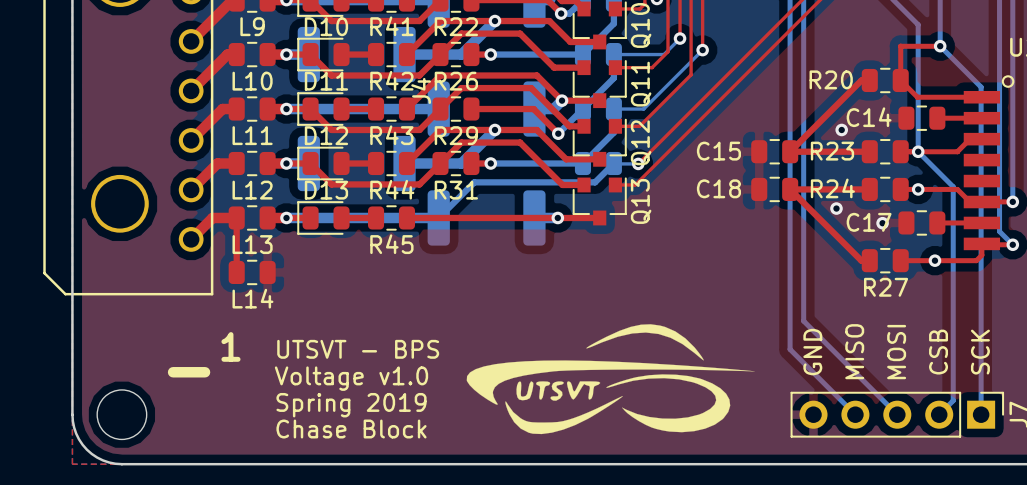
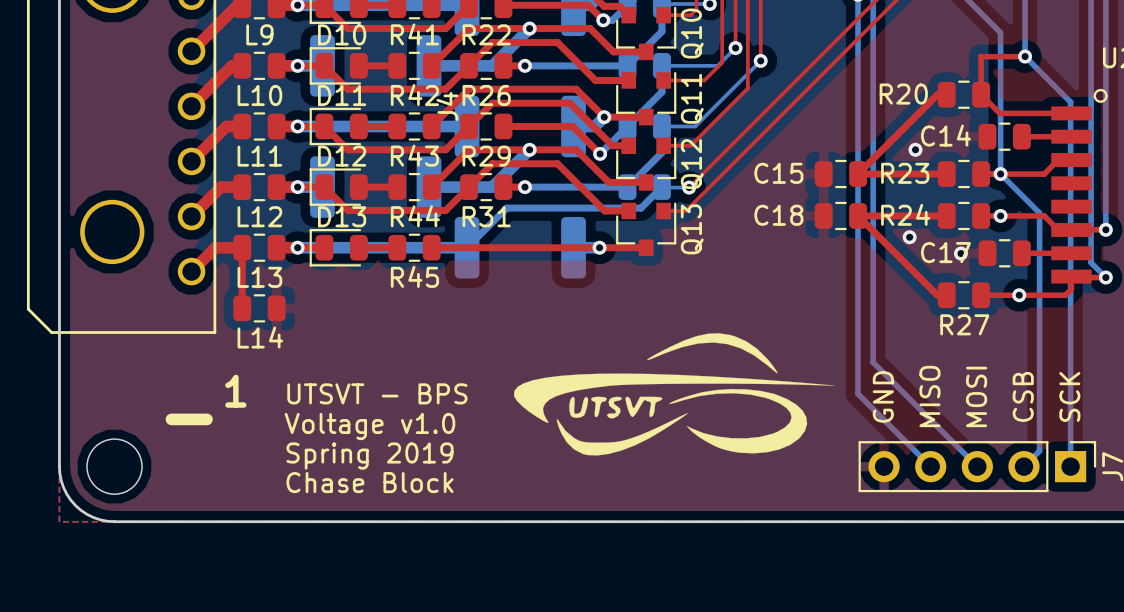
drawing position: (610, 379) -> (674, 394)

